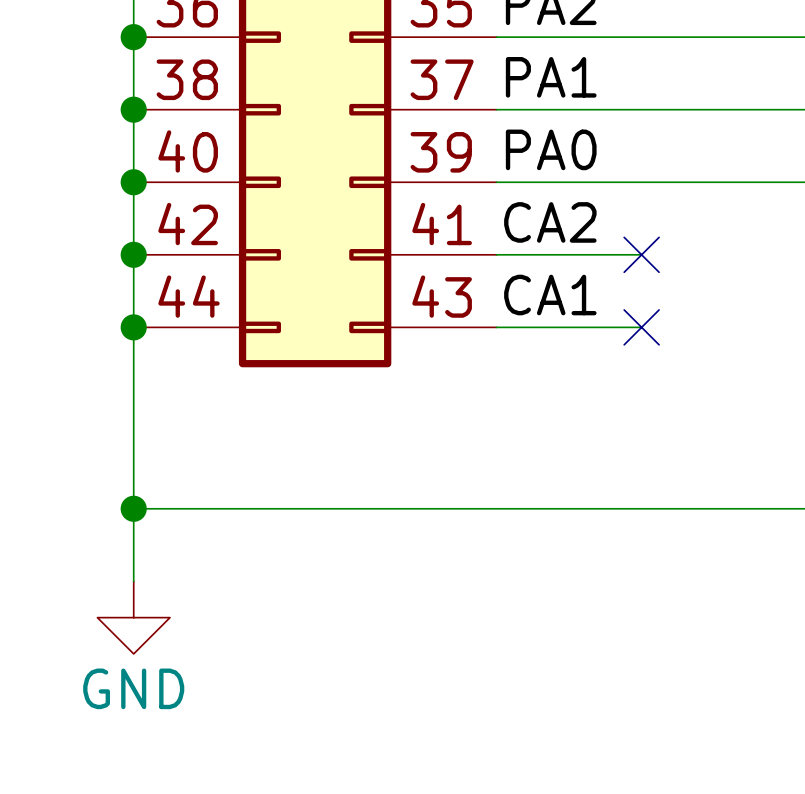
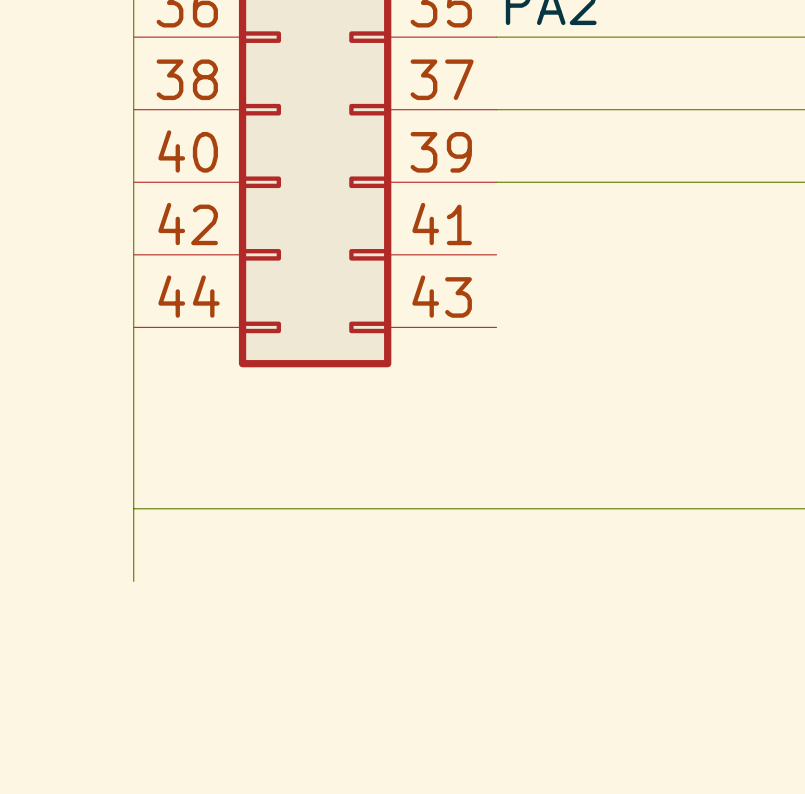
junction: (133, 37) -> none
label: PA1 (551, 77) -> none
junction: (133, 109) -> none
label: PA0 (551, 149) -> none
junction: (133, 182) -> none
label: CA2 (550, 222) -> none
junction: (133, 254) -> none
wire: (496, 254) (641, 254) -> none
no-connect mark: (641, 254) -> none
label: CA1 (550, 295) -> none
junction: (133, 327) -> none
wire: (496, 327) (641, 327) -> none
no-connect mark: (641, 327) -> none
junction: (133, 508) -> none
power symbol: GND (133, 617) -> none

